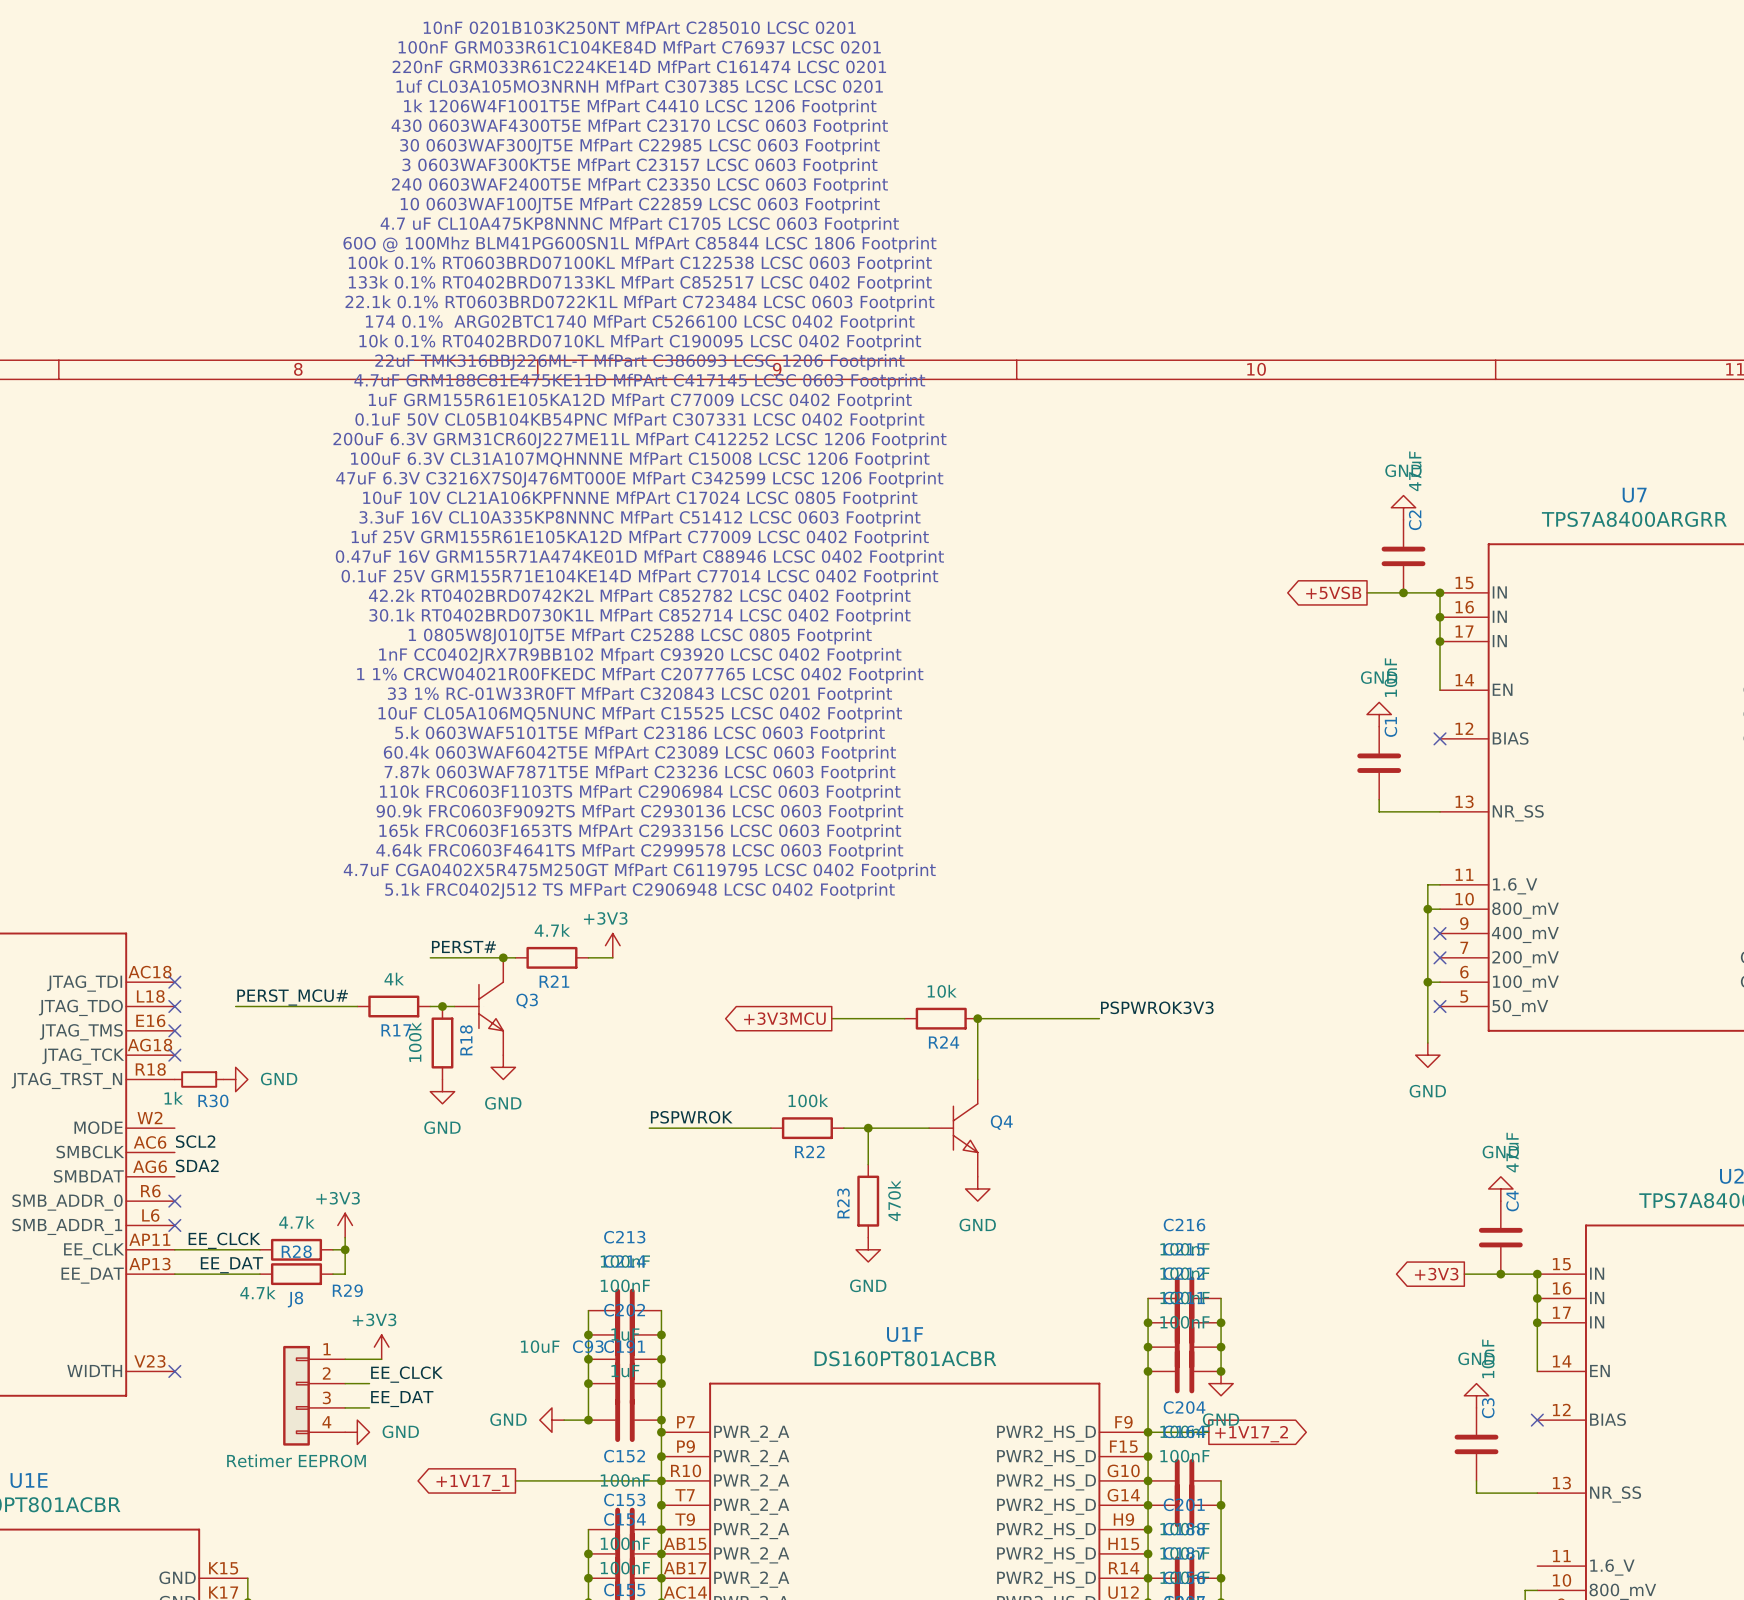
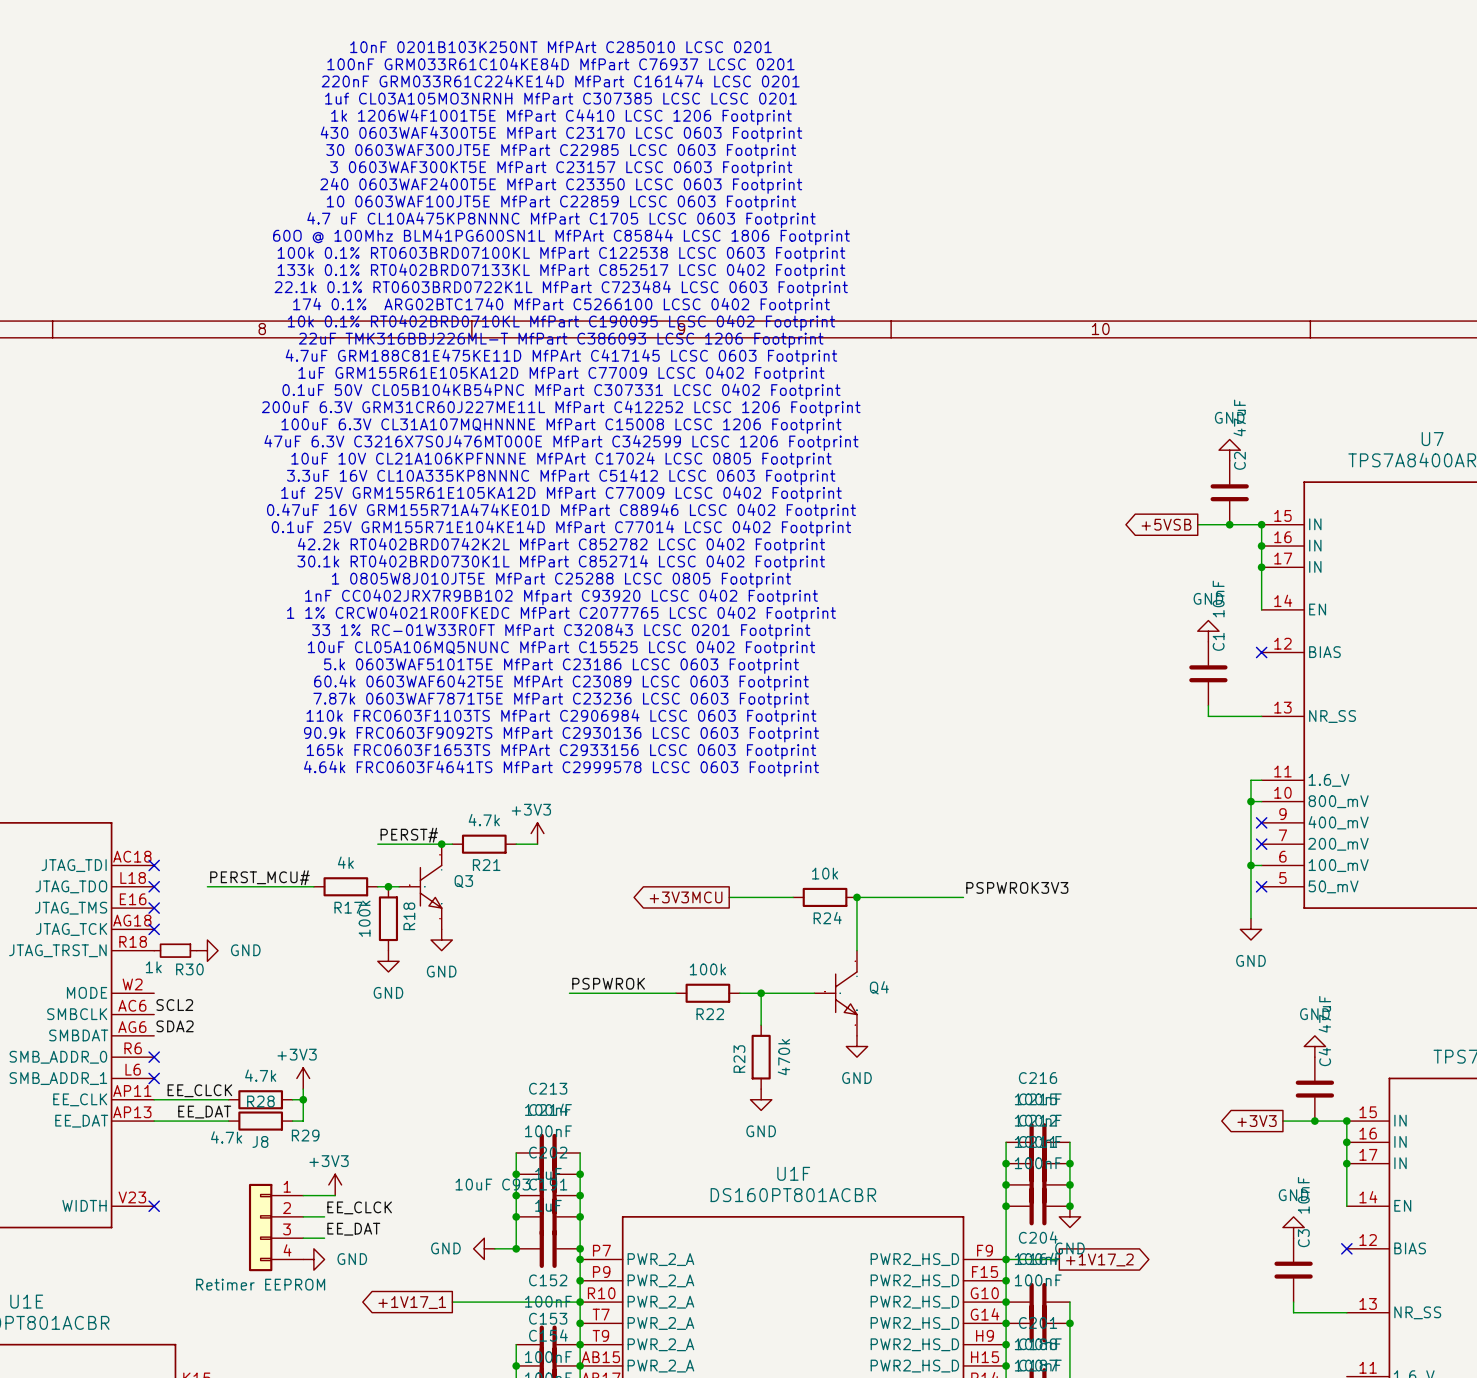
text: 10nF 0201B103K250NT MfPArt C285010 LCSC 0201 (639, 27) -> none
text: 100nF GRM033R61C104KE84D MfPart C76937 LCSC 0201 (639, 47) -> 10nF 0201B103K250NT MfPArt C285010 LCSC 0201 (560, 47)
text: 220nF GRM033R61C224KE14D MfPart C161474 LCSC 0201 (639, 66) -> 100nF GRM033R61C104KE84D MfPart C76937 LCSC 0201 (560, 64)
text: 1uf CL03A105MO3NRNH MfPart C307385 LCSC LCSC 0201 (639, 86) -> 220nF GRM033R61C224KE14D MfPart C161474 LCSC 0201 (560, 81)
text: 1k 1206W4F1001T5E MfPart C4410 LCSC 1206 Footprint (640, 107) -> 1uf CL03A105MO3NRNH MfPart C307385 LCSC LCSC 0201 (560, 98)
text: 430 0603WAF4300T5E MfPart C23170 LCSC 0603 Footprint (639, 127) -> 1k 1206W4F1001T5E MfPart C4410 LCSC 1206 Footprint (561, 117)
text: 30 0603WAF300JT5E MfPart C22985 LCSC 0603 Footprint (639, 146) -> 430 0603WAF4300T5E MfPart C23170 LCSC 0603 Footprint (561, 134)
text: 3 0603WAF300KT5E MfPart C23157 LCSC 0603 Footprint (639, 166) -> 30 0603WAF300JT5E MfPart C22985 LCSC 0603 Footprint (561, 151)
text: 240 0603WAF2400T5E MfPart C23350 LCSC 0603 Footprint (639, 185) -> 3 0603WAF300KT5E MfPart C23157 LCSC 0603 Footprint (561, 168)
text: 10 0603WAF100JT5E MfPart C22859 LCSC 0603 Footprint (640, 205) -> 240 0603WAF2400T5E MfPart C23350 LCSC 0603 Footprint (561, 185)
text: 4.7 uF CL10A475KP8NNNC MfPart C1705 LCSC 0603 Footprint (639, 225) -> 10 0603WAF100JT5E MfPart C22859 LCSC 0603 Footprint (561, 203)
text: 60O @ 100Mhz BLM41PG600SN1L MfPArt C85844 LCSC 1806 Footprint (639, 244) -> 4.7 uF CL10A475KP8NNNC MfPart C1705 LCSC 0603 Footprint (561, 220)
text: 100k 0.1% RT0603BRD07100KL MfPart C122538 LCSC 0603 Footprint (640, 264) -> 60O @ 100Mhz BLM41PG600SN1L MfPArt C85844 LCSC 1806 Footprint (561, 237)
text: 133k 0.1% RT0402BRD07133KL MfPart C852517 LCSC 0402 Footprint (640, 283) -> 100k 0.1% RT0603BRD07100KL MfPart C122538 LCSC 0603 Footprint (561, 254)
text: 22.1k 0.1% RT0603BRD0722K1L MfPart C723484 LCSC 0603 Footprint (639, 303) -> 133k 0.1% RT0402BRD07133KL MfPart C852517 LCSC 0402 Footprint (561, 271)
text: 174 0.1% ARG02BTC1740 MfPart C5266100 LCSC 0402 Footprint (640, 323) -> 22.1k 0.1% RT0603BRD0722K1L MfPart C723484 LCSC 0603 Footprint (561, 288)
text: 10k 0.1% RT0402BRD0710KL MfPart C190095 LCSC 0402 Footprint (640, 342) -> 174 0.1% ARG02BTC1740 MfPart C5266100 LCSC 0402 Footprint (561, 305)
text: 22uF TMK316BBJ226ML-T MfPart C386093 LCSC 1206 Footprint (639, 362) -> 10k 0.1% RT0402BRD0710KL MfPart C190095 LCSC 0402 Footprint (561, 323)
text: 4.7uF GRM188C81E475KE11D MfPArt C417145 LCSC 0603 Footprint (639, 381) -> 22uF TMK316BBJ226ML-T MfPart C386093 LCSC 1206 Footprint (561, 340)
text: 1uF GRM155R61E105KA12D MfPart C77009 LCSC 0402 Footprint (640, 401) -> 4.7uF GRM188C81E475KE11D MfPArt C417145 LCSC 0603 Footprint (561, 357)
text: 0.1uF 50V CL05B104KB54PNC MfPart C307331 LCSC 0402 Footprint (639, 420) -> 1uF GRM155R61E105KA12D MfPart C77009 LCSC 0402 Footprint (561, 374)
text: 200uF 6.3V GRM31CR60J227ME11L MfPart C412252 LCSC 1206 Footprint (639, 440) -> 0.1uF 50V CL05B104KB54PNC MfPart C307331 LCSC 0402 Footprint (561, 391)
text: 100uF 6.3V CL31A107MQHNNNE MfPart C15008 LCSC 1206 Footprint (640, 460) -> 200uF 6.3V GRM31CR60J227ME11L MfPart C412252 LCSC 1206 Footprint (561, 408)
text: 47uF 6.3V C3216X7S0J476MT000E MfPart C342599 LCSC 1206 Footprint (639, 479) -> 100uF 6.3V CL31A107MQHNNNE MfPart C15008 LCSC 1206 Footprint (561, 426)
text: 10uF 10V CL21A106KPFNNNE MfPArt C17024 LCSC 0805 Footprint (640, 499) -> 47uF 6.3V C3216X7S0J476MT000E MfPart C342599 LCSC 1206 Footprint (561, 443)
text: 3.3uF 16V CL10A335KP8NNNC MfPart C51412 LCSC 0603 Footprint (639, 518) -> 10uF 10V CL21A106KPFNNNE MfPArt C17024 LCSC 0805 Footprint (561, 460)
text: 1uf 25V GRM155R61E105KA12D MfPart C77009 LCSC 0402 Footprint (640, 538) -> 3.3uF 16V CL10A335KP8NNNC MfPart C51412 LCSC 0603 Footprint (561, 477)
text: 0.47uF 16V GRM155R71A474KE01D MfPart C88946 LCSC 0402 Footprint (639, 558) -> 1uf 25V GRM155R61E105KA12D MfPart C77009 LCSC 0402 Footprint (561, 494)
text: 0.1uF 25V GRM155R71E104KE14D MfPart C77014 LCSC 0402 Footprint (639, 577) -> 0.47uF 16V GRM155R71A474KE01D MfPart C88946 LCSC 0402 Footprint (561, 511)
text: 42.2k RT0402BRD0742K2L MfPart C852782 LCSC 0402 Footprint (639, 597) -> 0.1uF 25V GRM155R71E104KE14D MfPart C77014 LCSC 0402 Footprint (561, 528)
text: 30.1k RT0402BRD0730K1L MfPart C852714 LCSC 0402 Footprint (639, 616) -> 42.2k RT0402BRD0742K2L MfPart C852782 LCSC 0402 Footprint (561, 545)
text: 1 0805W8J010JT5E MfPart C25288 LCSC 0805 Footprint (640, 636) -> 30.1k RT0402BRD0730K1L MfPart C852714 LCSC 0402 Footprint (561, 563)
text: 1nF CC0402JRX7R9BB102 Mfpart C93920 LCSC 0402 Footprint (640, 655) -> 1 0805W8J010JT5E MfPart C25288 LCSC 0805 Footprint (561, 580)
text: 1 1% CRCW04021R00FKEDC MfPart C2077765 LCSC 0402 Footprint (640, 675) -> 1nF CC0402JRX7R9BB102 Mfpart C93920 LCSC 0402 Footprint (561, 597)
text: 33 1% RC-01W33R0FT MfPart C320843 LCSC 0201 Footprint (639, 695) -> 1 1% CRCW04021R00FKEDC MfPart C2077765 LCSC 0402 Footprint (561, 614)
text: 10uF CL05A106MQ5NUNC MfPart C15525 LCSC 0402 Footprint (640, 714) -> 33 1% RC-01W33R0FT MfPart C320843 LCSC 0201 Footprint (561, 631)
text: 5.k 0603WAF5101T5E MfPart C23186 LCSC 0603 Footprint (639, 734) -> 10uF CL05A106MQ5NUNC MfPart C15525 LCSC 0402 Footprint (561, 648)
text: 60.4k 0603WAF6042T5E MfPArt C23089 LCSC 0603 Footprint (639, 753) -> 5.k 0603WAF5101T5E MfPart C23186 LCSC 0603 Footprint (561, 666)
text: 7.87k 0603WAF7871T5E MfPart C23236 LCSC 0603 Footprint (640, 773) -> 60.4k 0603WAF6042T5E MfPArt C23089 LCSC 0603 Footprint (561, 683)
text: 110k FRC0603F1103TS MfPart C2906984 LCSC 0603 Footprint (640, 793) -> 7.87k 0603WAF7871T5E MfPart C23236 LCSC 0603 Footprint (561, 700)
text: 90.9k FRC0603F9092TS MfPart C2930136 LCSC 0603 Footprint (639, 812) -> 110k FRC0603F1103TS MfPart C2906984 LCSC 0603 Footprint (561, 717)
text: 165k FRC0603F1653TS MfPArt C2933156 LCSC 0603 Footprint (640, 832) -> 90.9k FRC0603F9092TS MfPart C2930136 LCSC 0603 Footprint (561, 734)
text: 4.64k FRC0603F4641TS MfPart C2999578 LCSC 0603 Footprint (639, 851) -> 165k FRC0603F1653TS MfPArt C2933156 LCSC 0603 Footprint (561, 751)
text: 4.7uF CGA0402X5R475M250GT MfPart C6119795 LCSC 0402 Footprint (639, 871) -> 4.64k FRC0603F4641TS MfPart C2999578 LCSC 0603 Footprint (561, 768)
text: 5.1k FRC0402J512 TS MFPart C2906948 LCSC 0402 Footprint (639, 891) -> none

